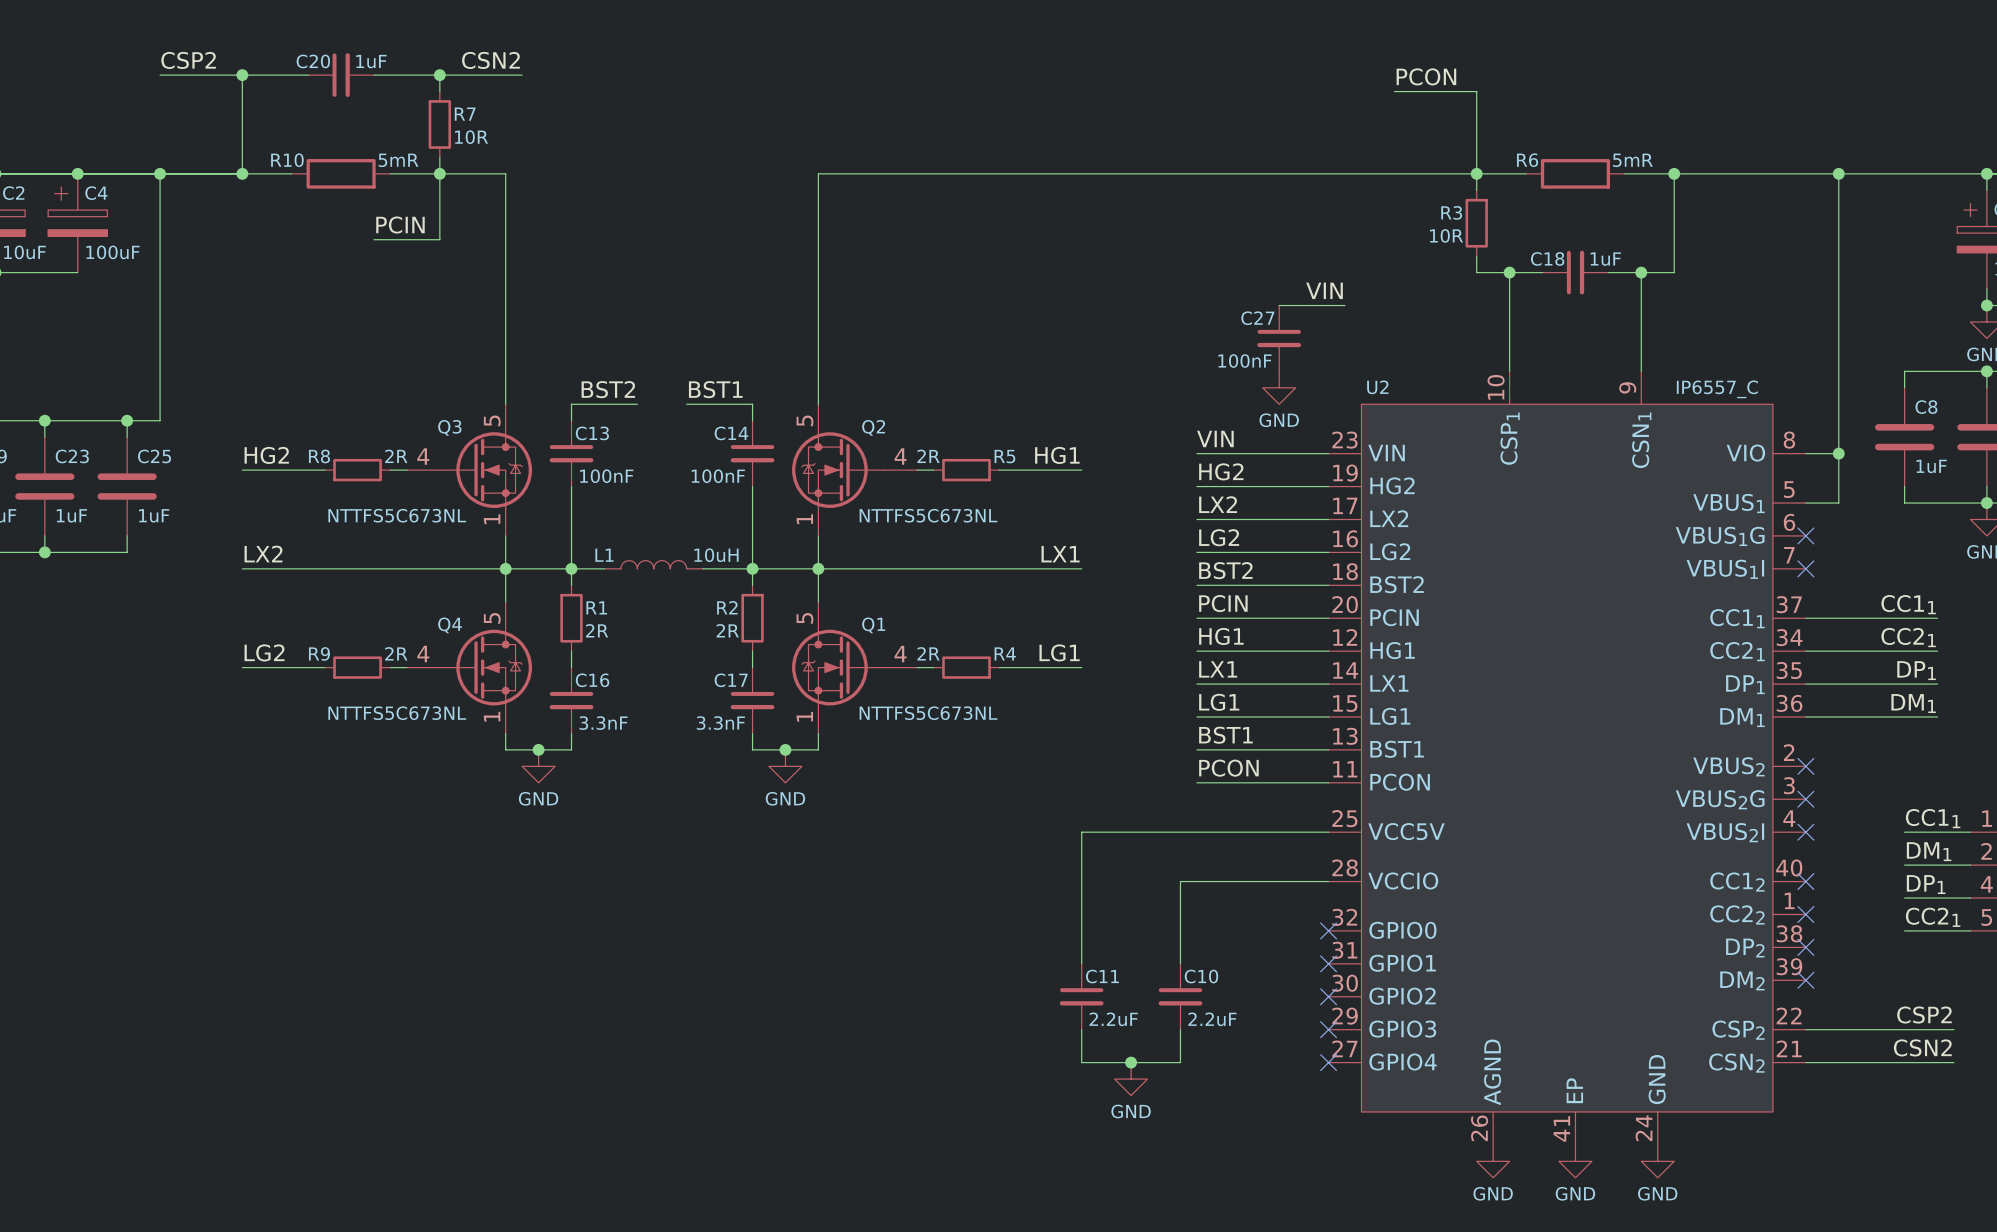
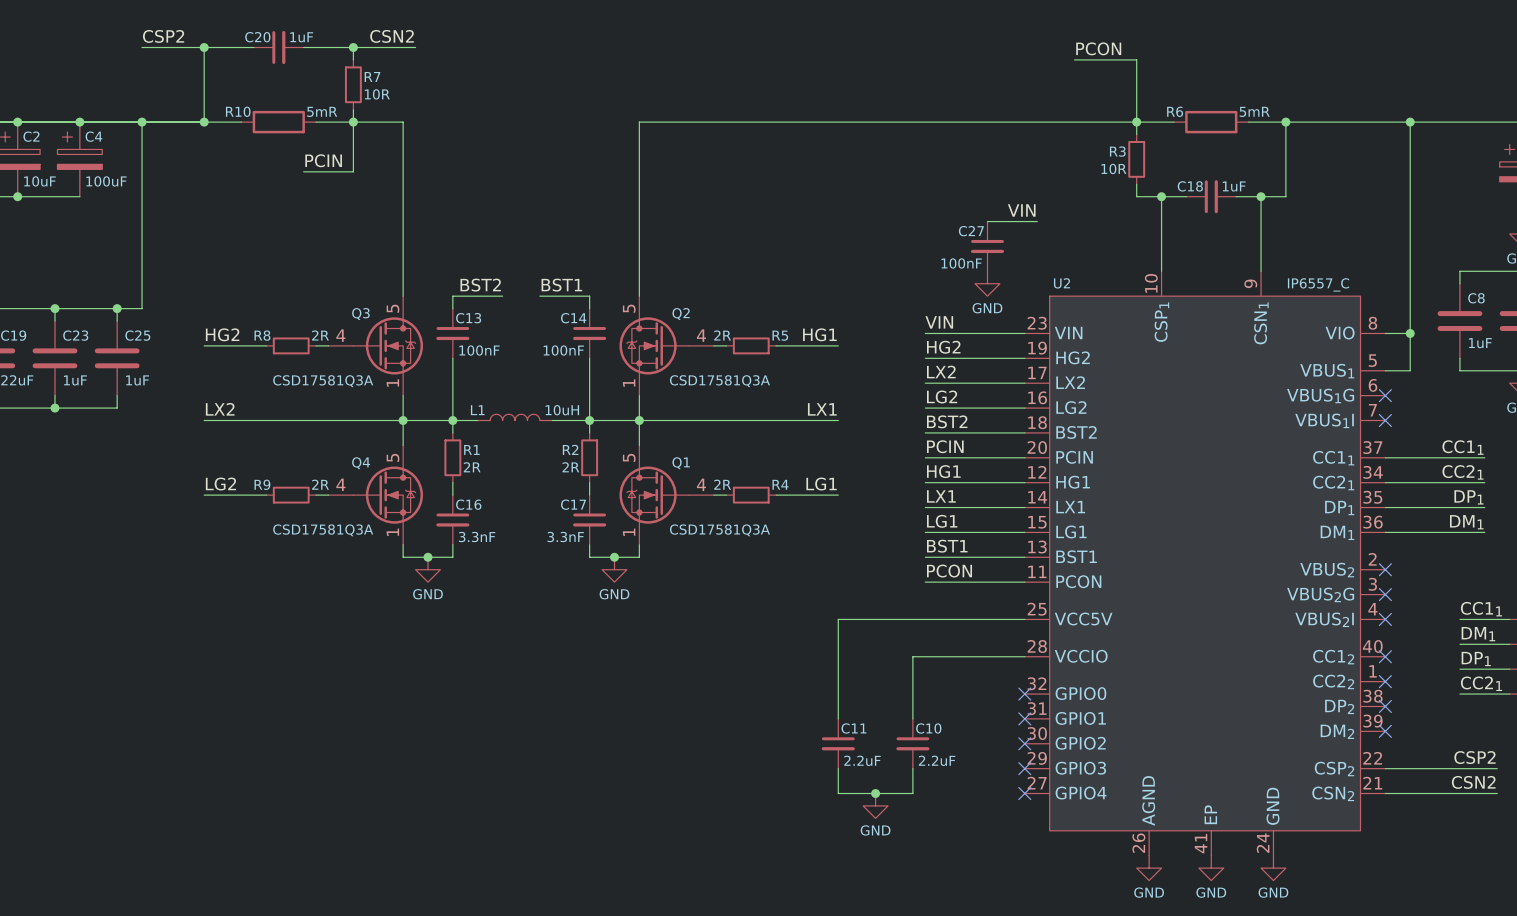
Q3 value: NTTFS5C673NL (397, 515) -> CSD17581Q3A (323, 381)
Q2 value: NTTFS5C673NL (928, 515) -> CSD17581Q3A (719, 381)
Q4 value: NTTFS5C673NL (397, 713) -> CSD17581Q3A (323, 530)
Q1 value: NTTFS5C673NL (928, 713) -> CSD17581Q3A (719, 530)

